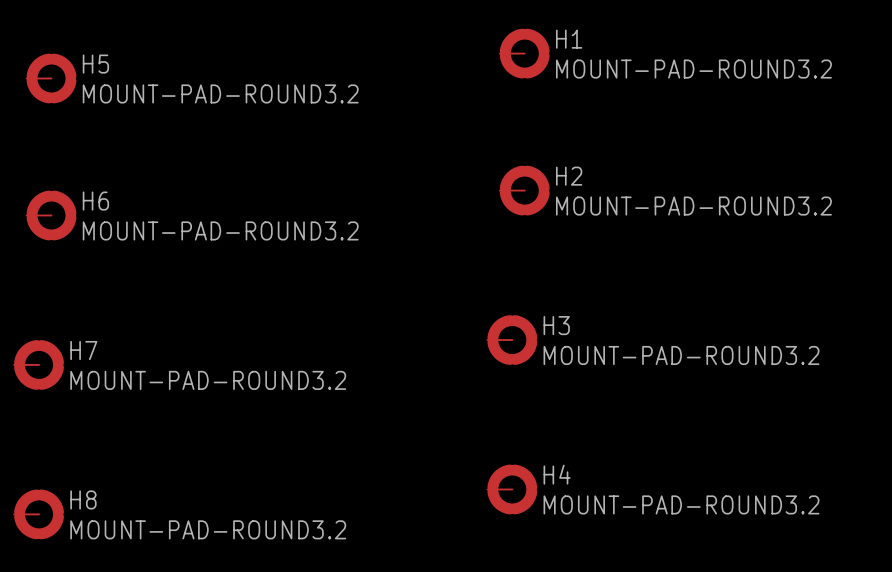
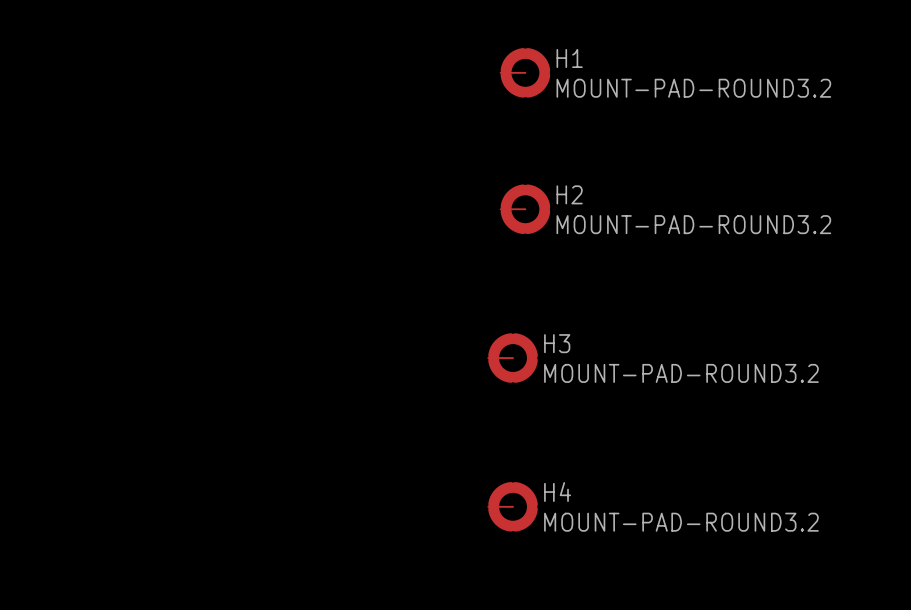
H5: MOUNT-PAD-ROUND3.2 (51, 78) -> none
H6: MOUNT-PAD-ROUND3.2 (51, 215) -> none
H7: MOUNT-PAD-ROUND3.2 (39, 364) -> none
H8: MOUNT-PAD-ROUND3.2 (39, 514) -> none

